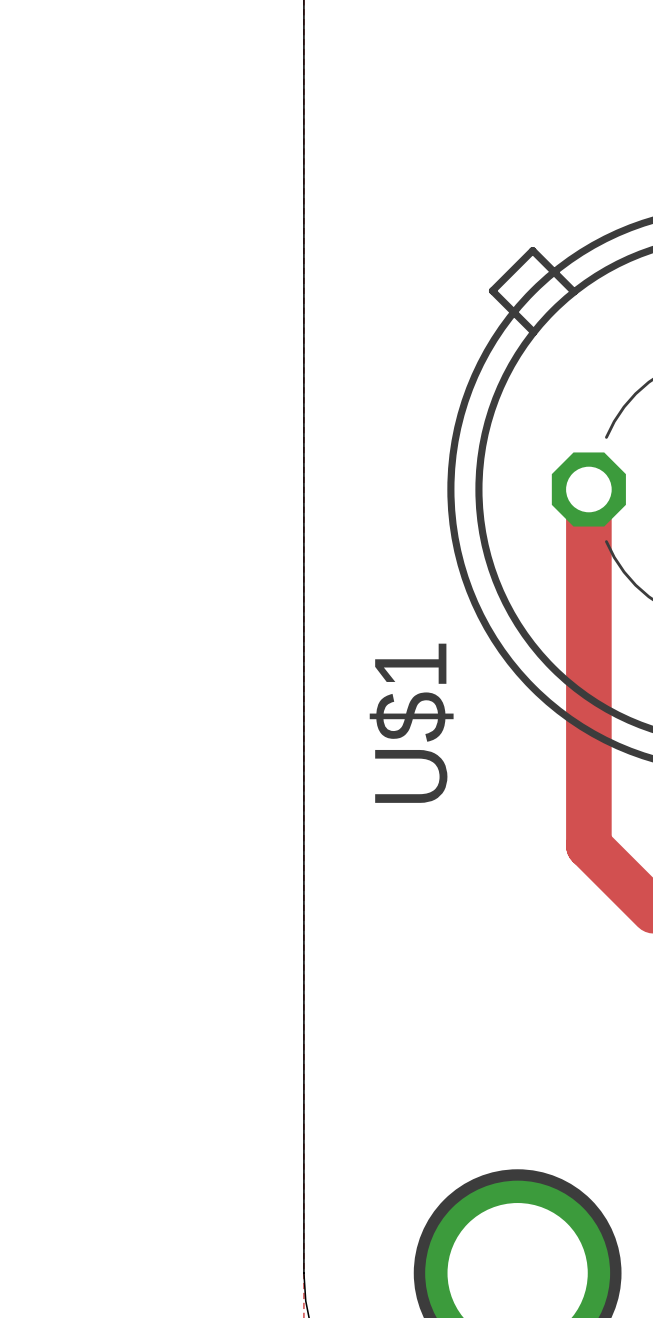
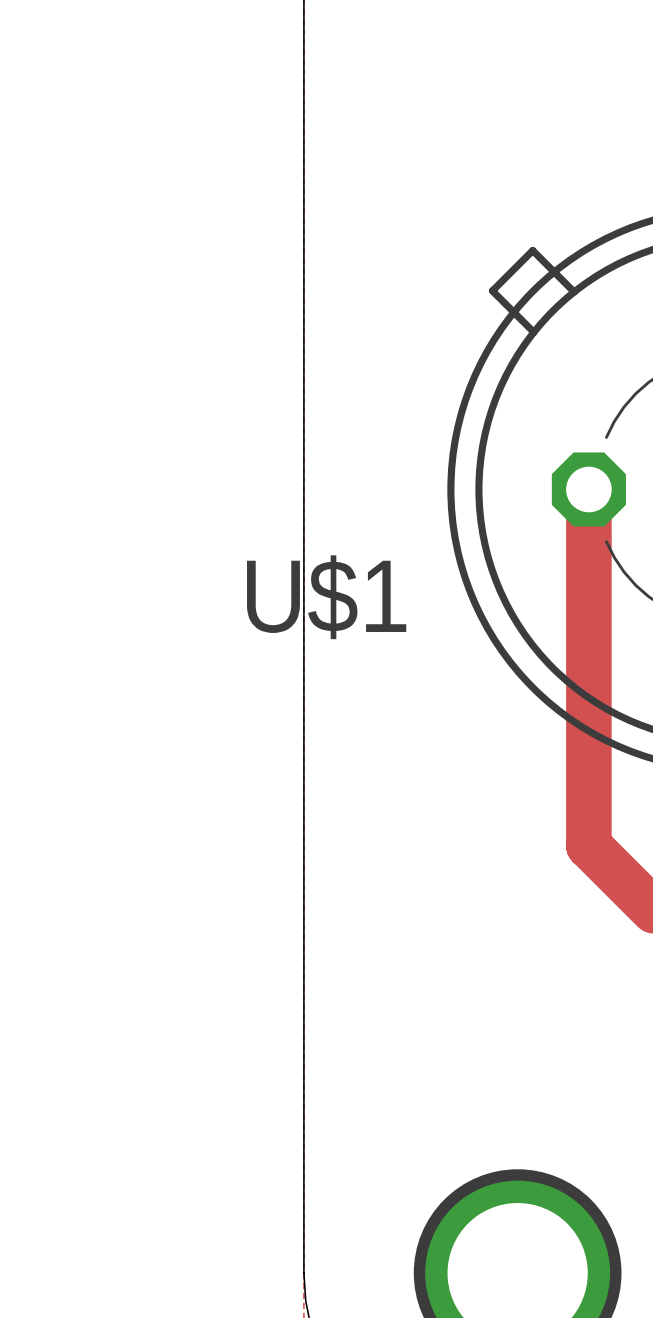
U$1 name rotation: 0° (411, 723) -> 90° clockwise (326, 597)

